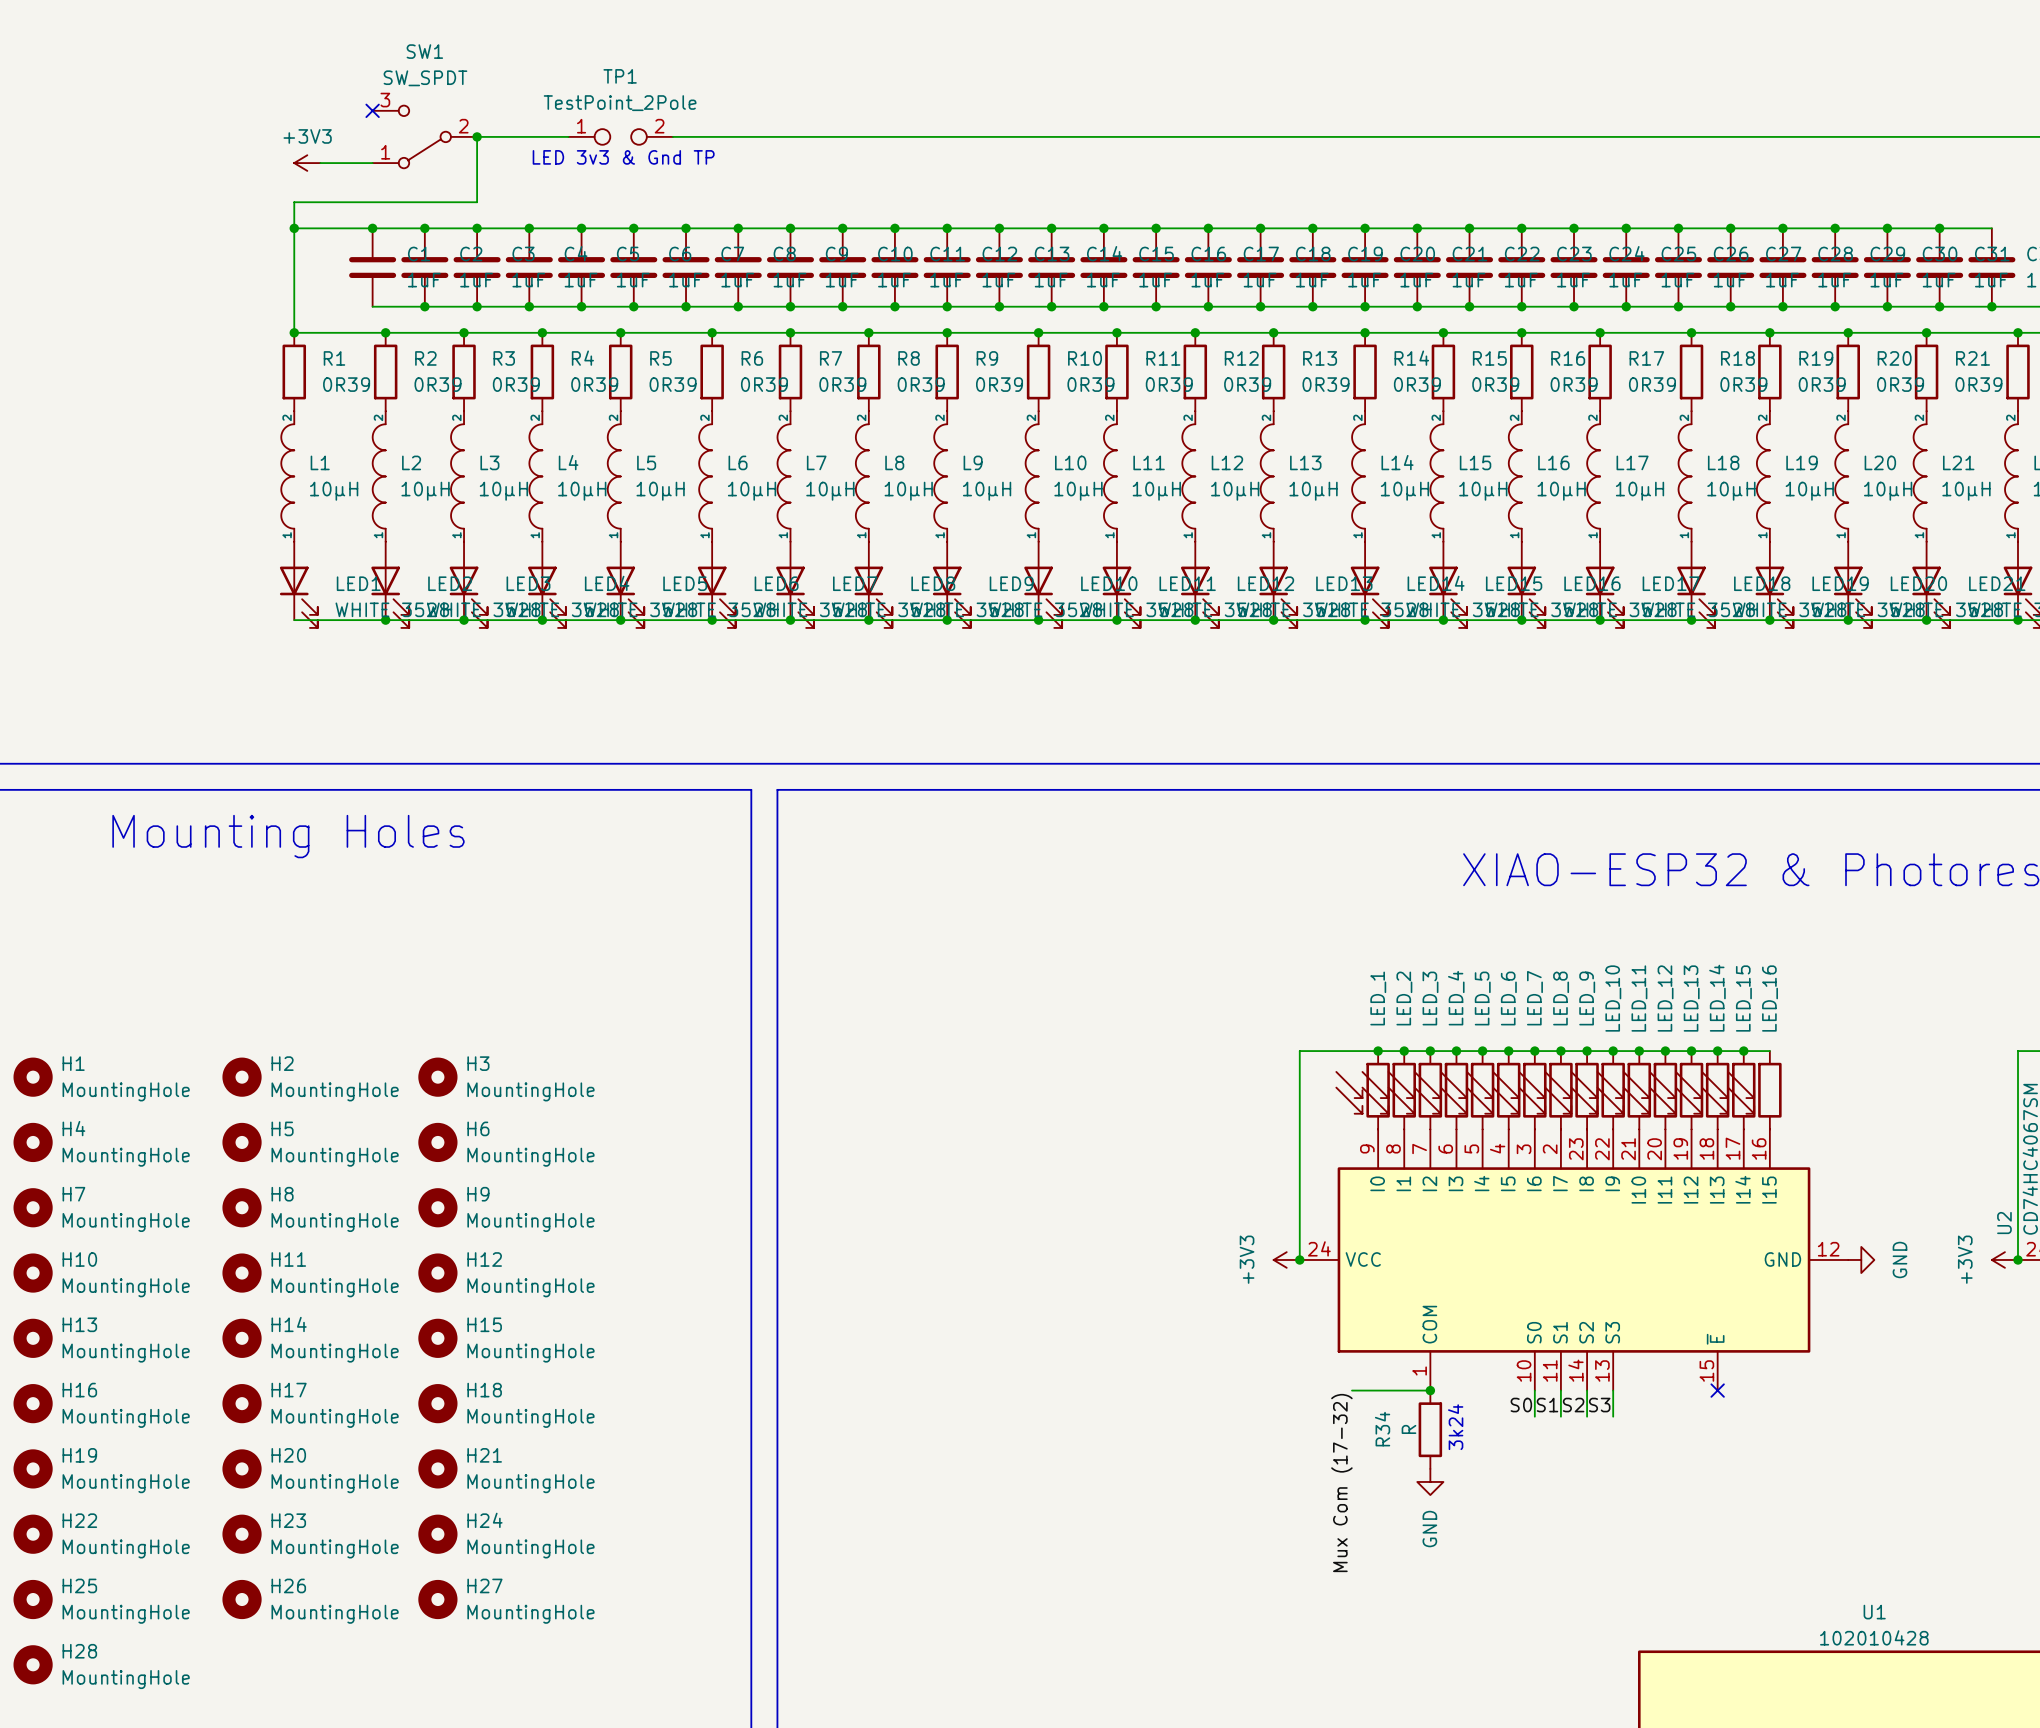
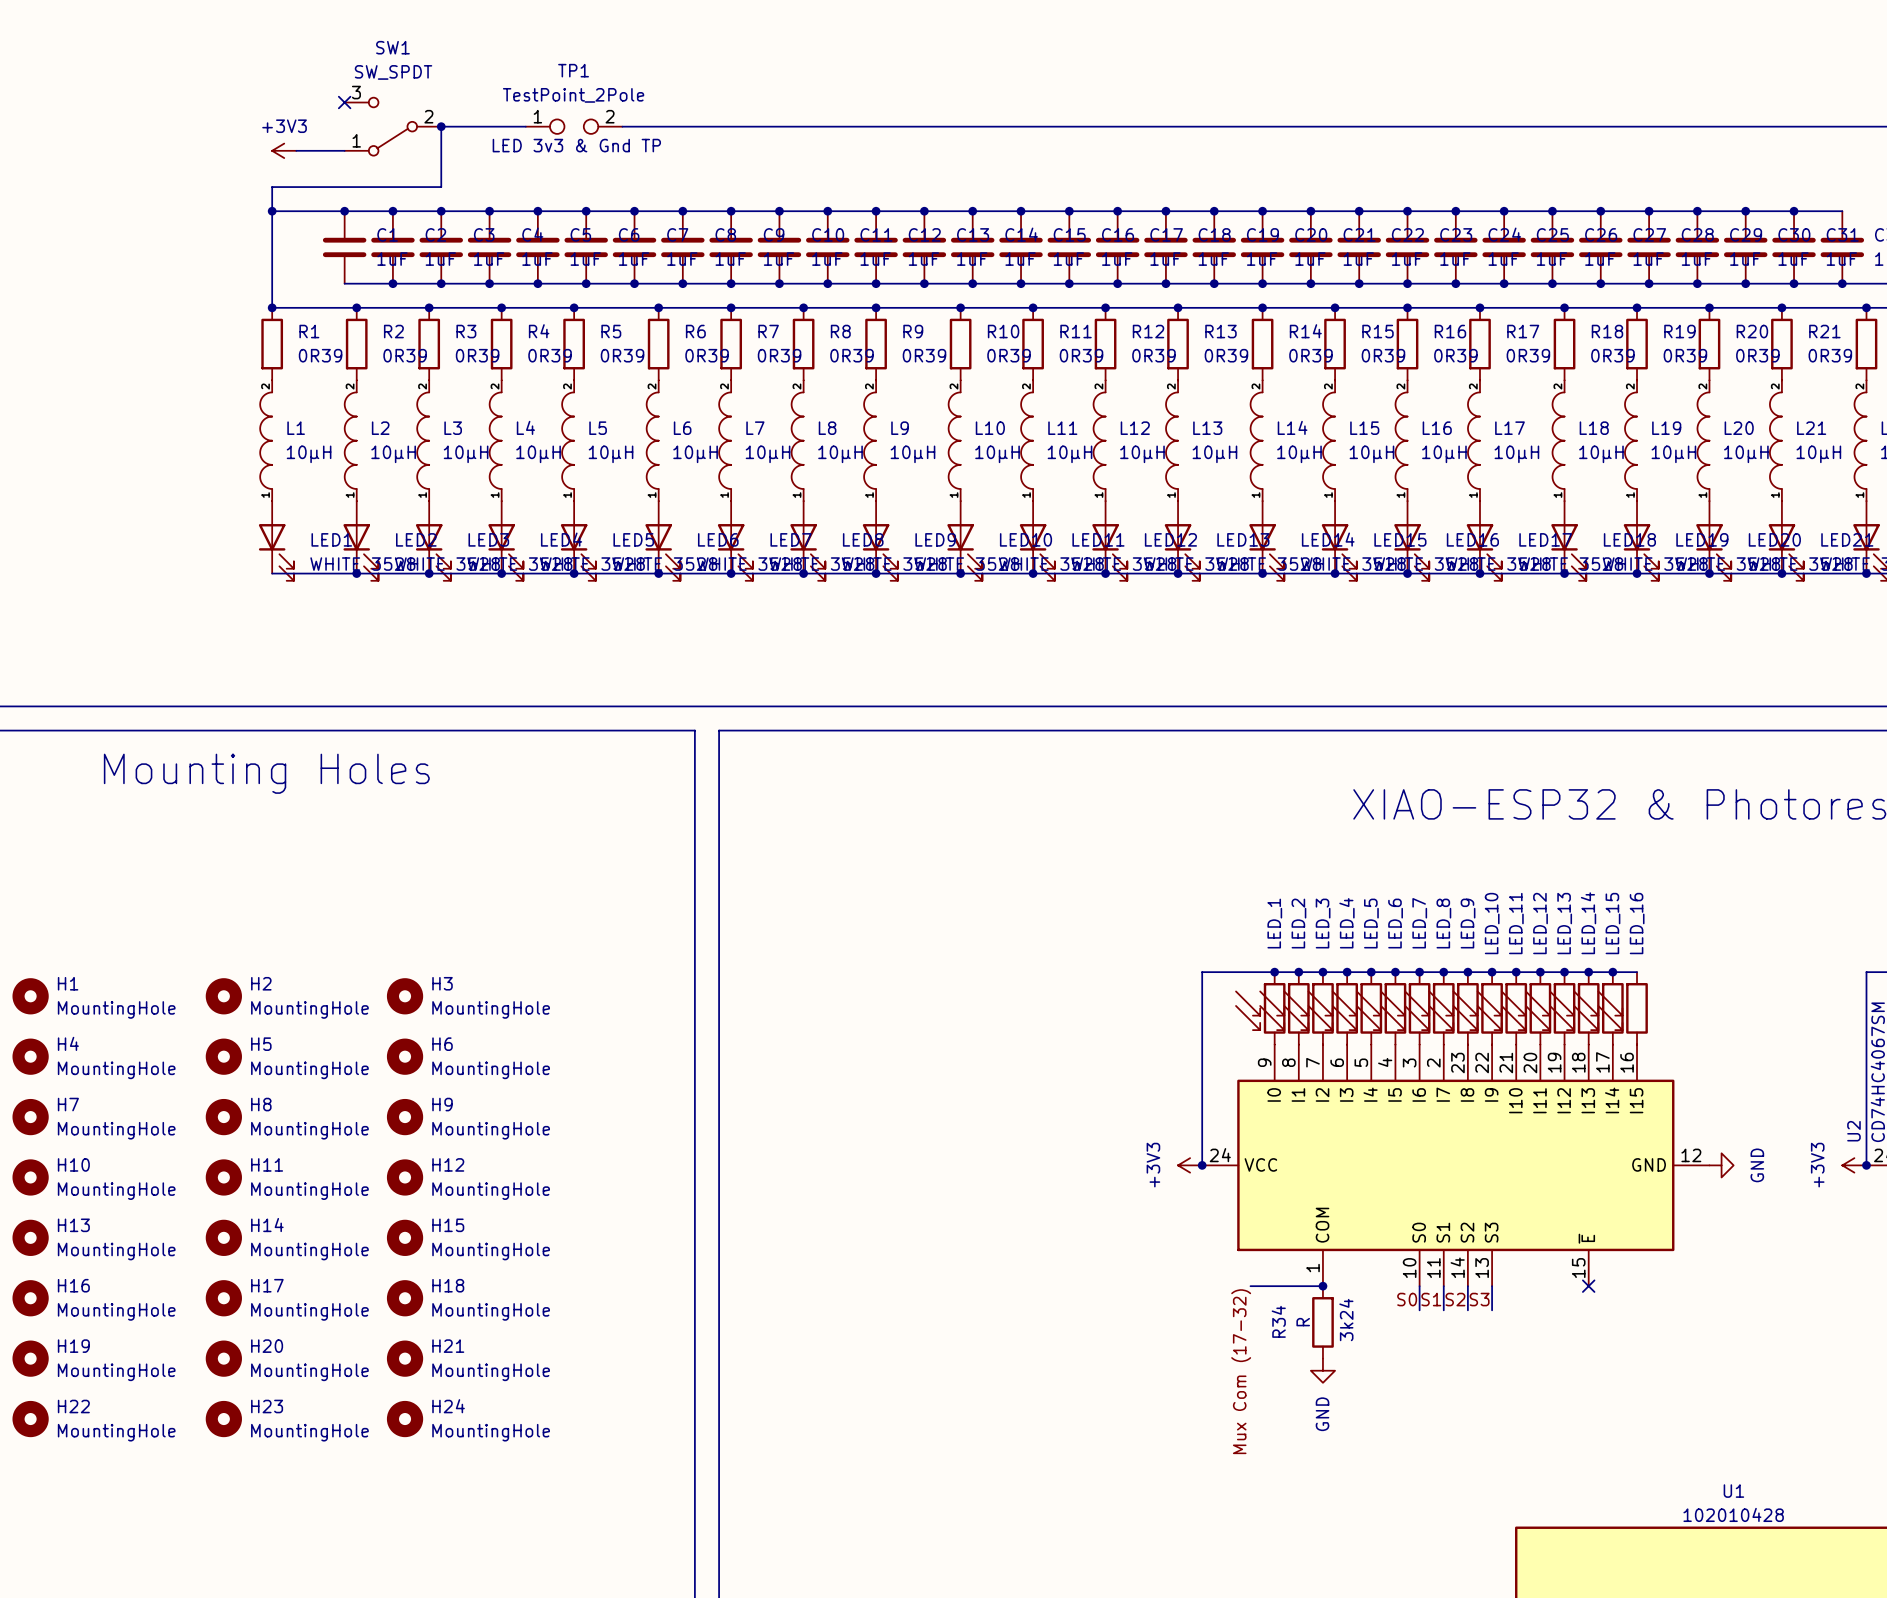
H25: MountingHole (33, 1599) -> none
H26: MountingHole (242, 1599) -> none
H27: MountingHole (437, 1599) -> none
H28: MountingHole (33, 1664) -> none

